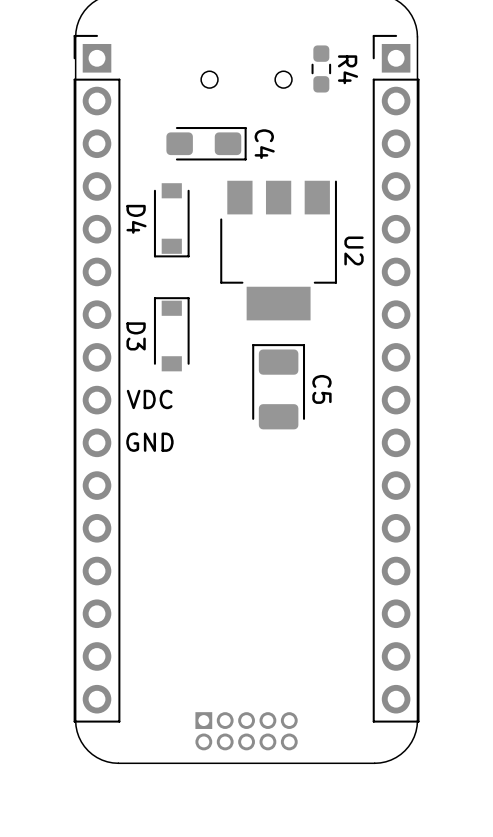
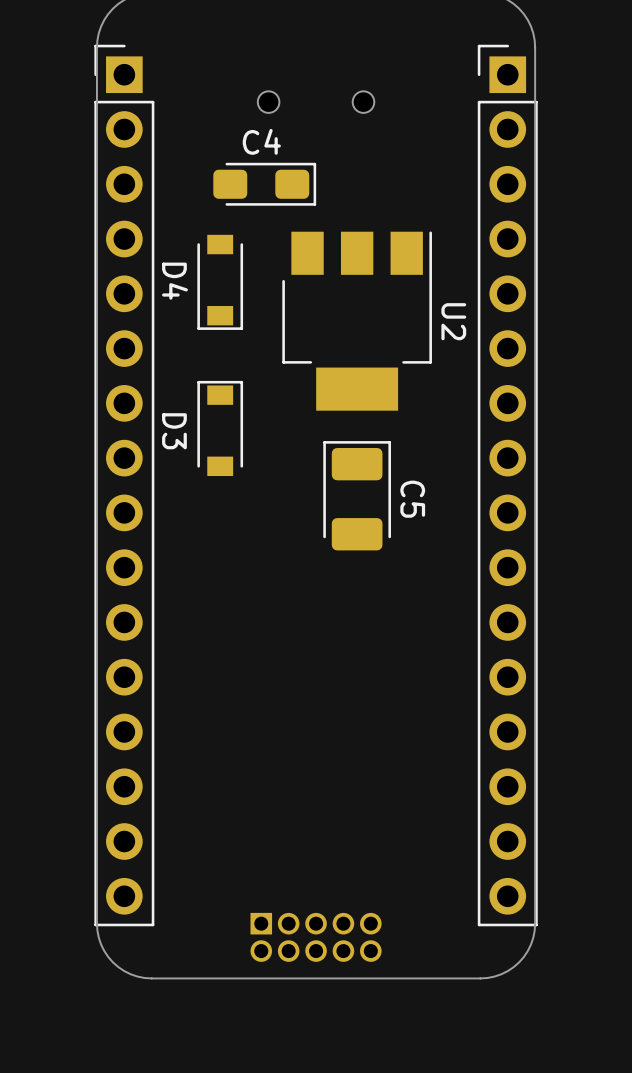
R4: (321, 68) -> none
C4 name rotation: 0° (264, 144) -> 90° counterclockwise (261, 141)
C4 name position: C4 (264, 144) -> C4 (261, 141)
text: VDC (149, 399) -> none
text: GND (149, 442) -> none

